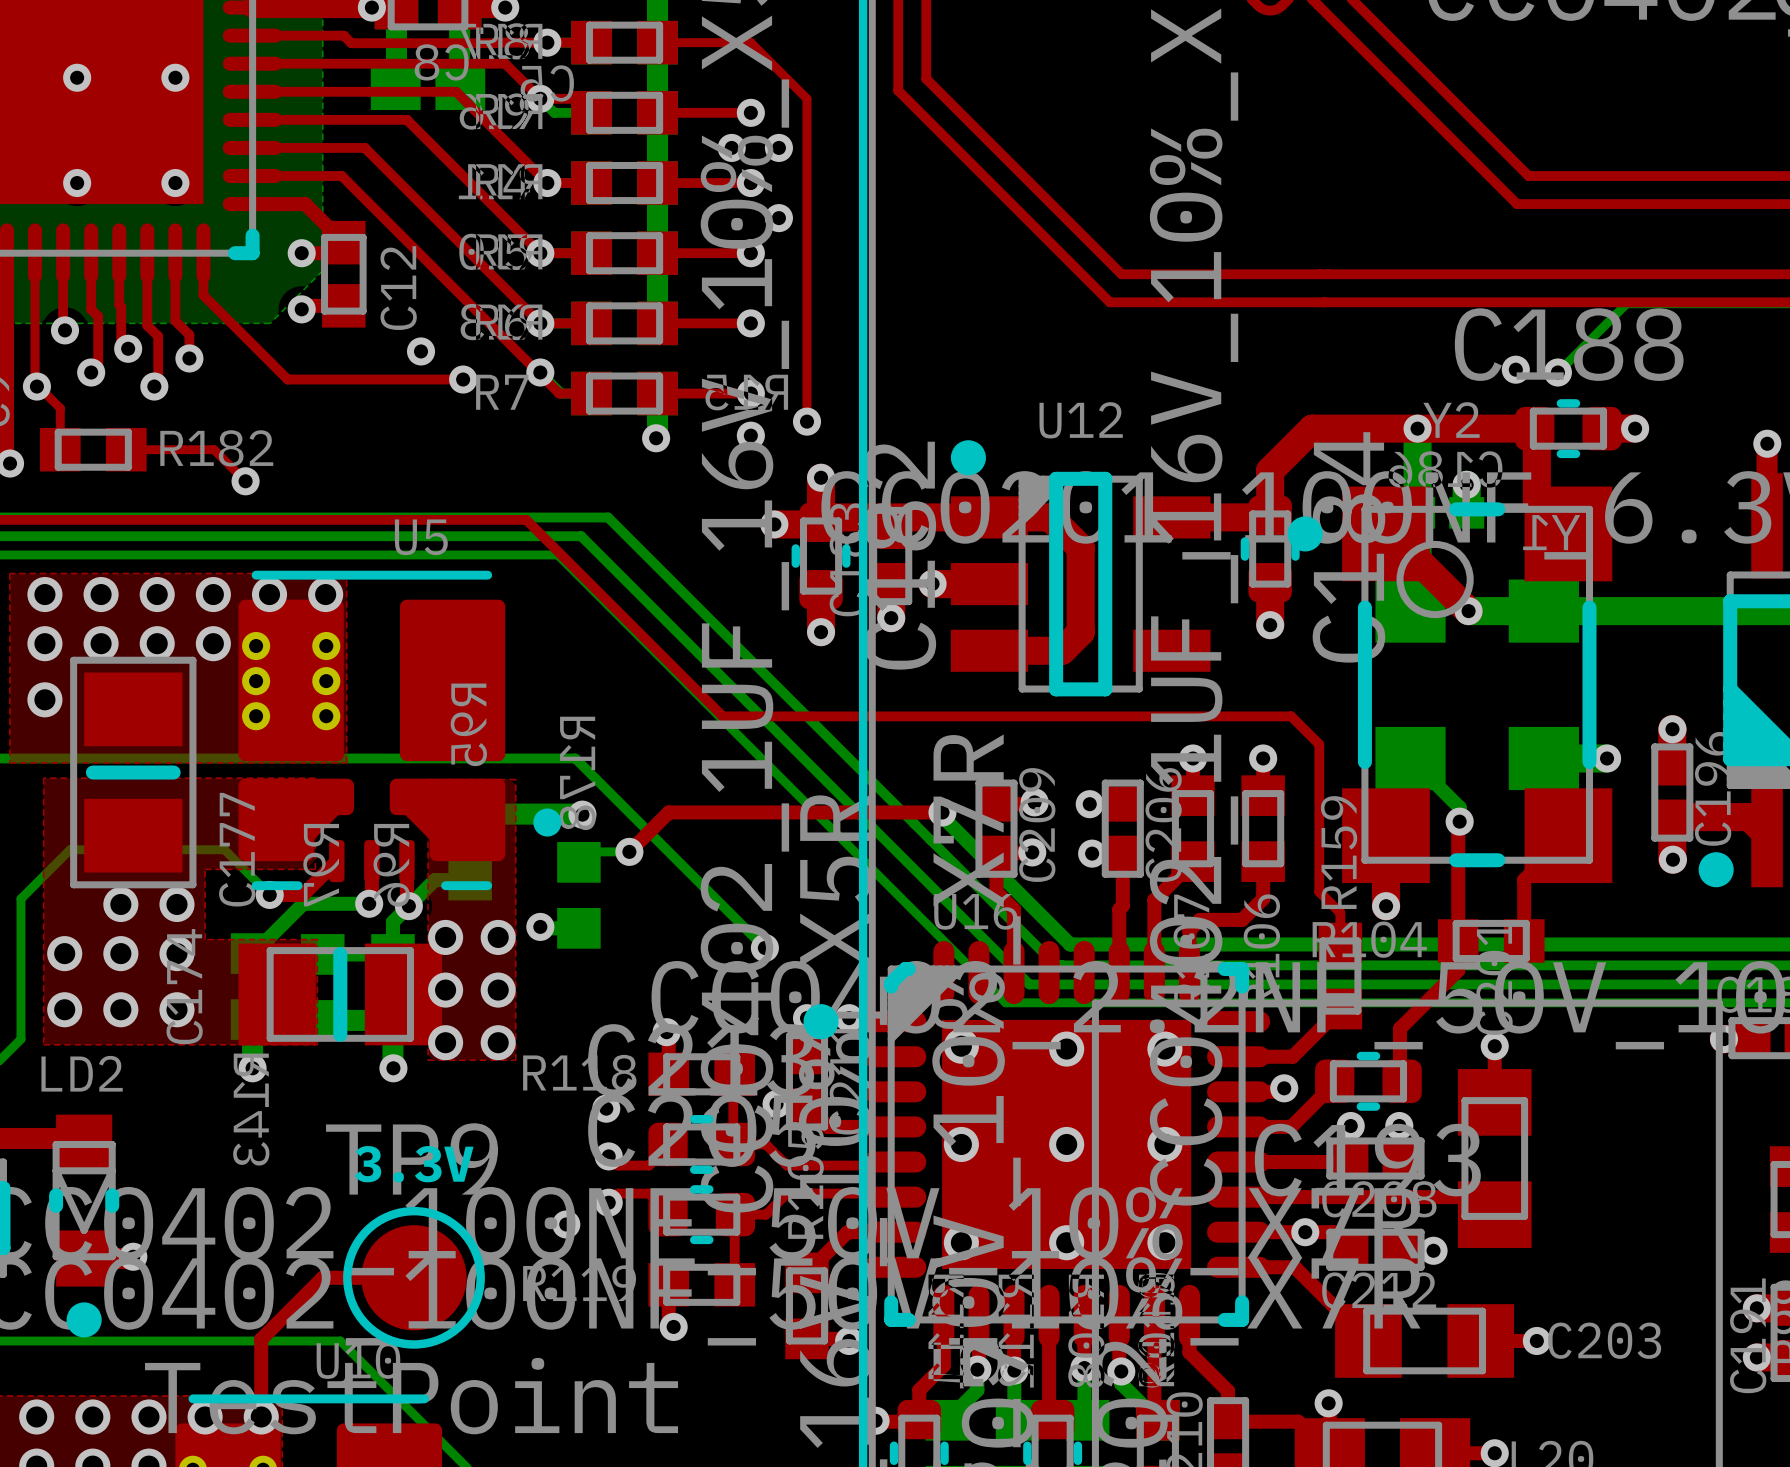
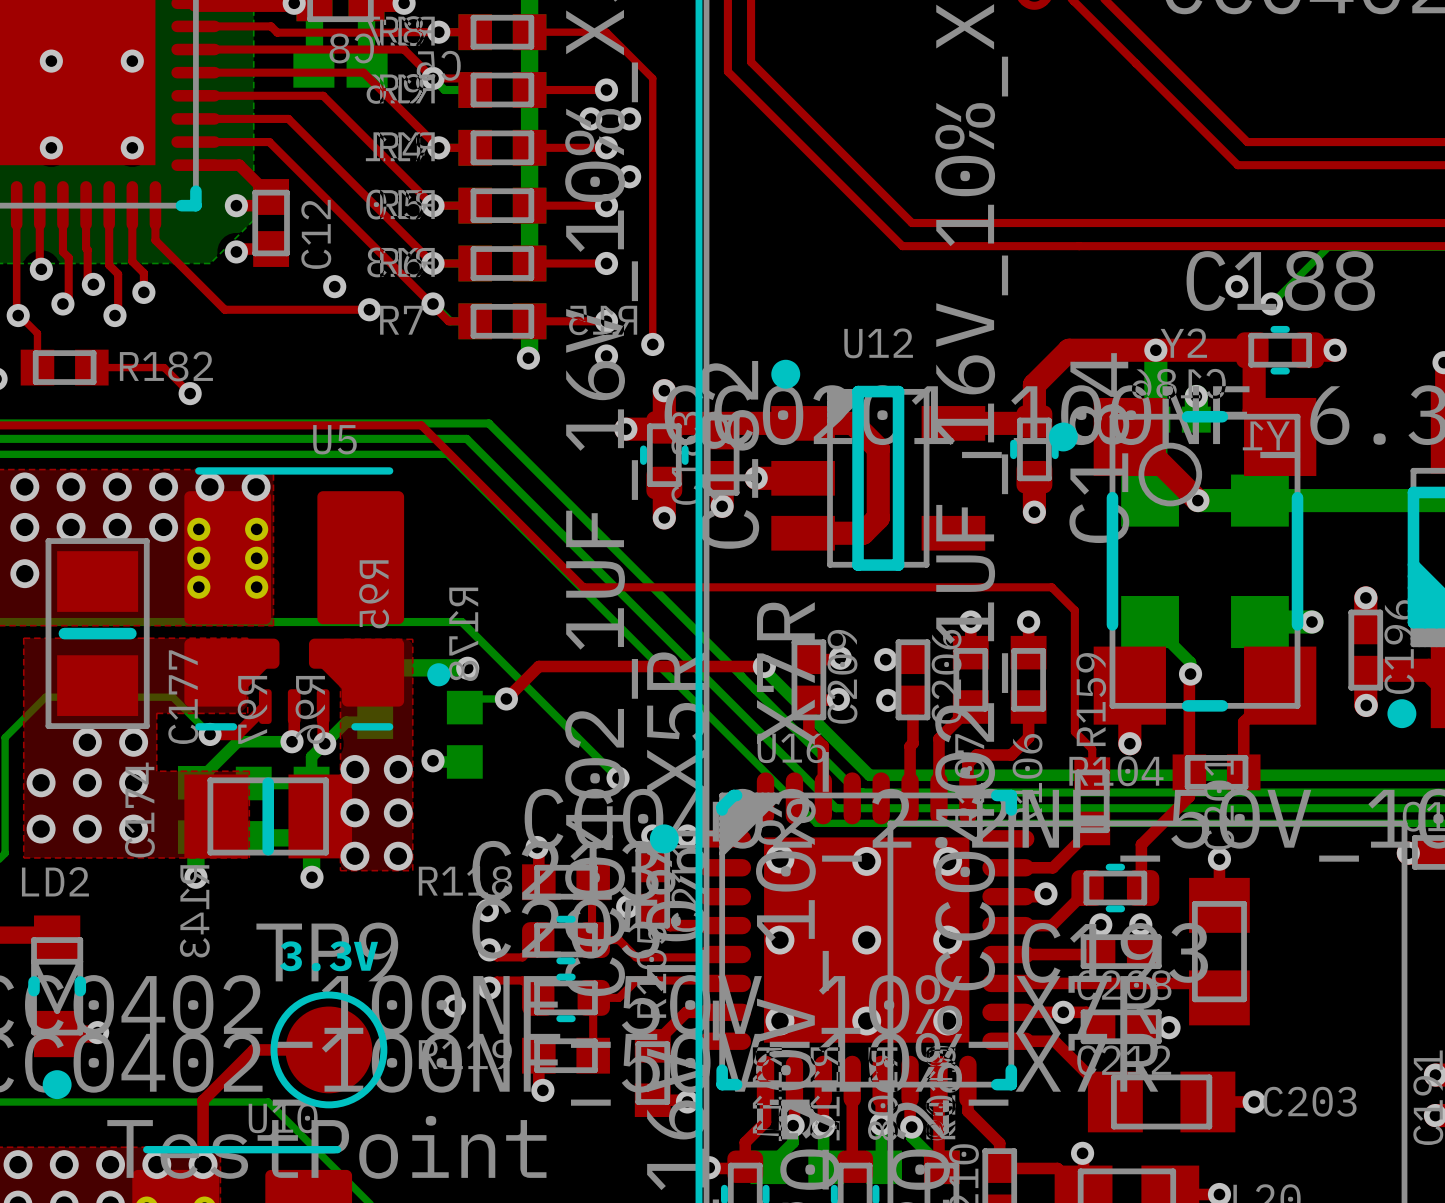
via position: (1515, 369) -> (1236, 286)

